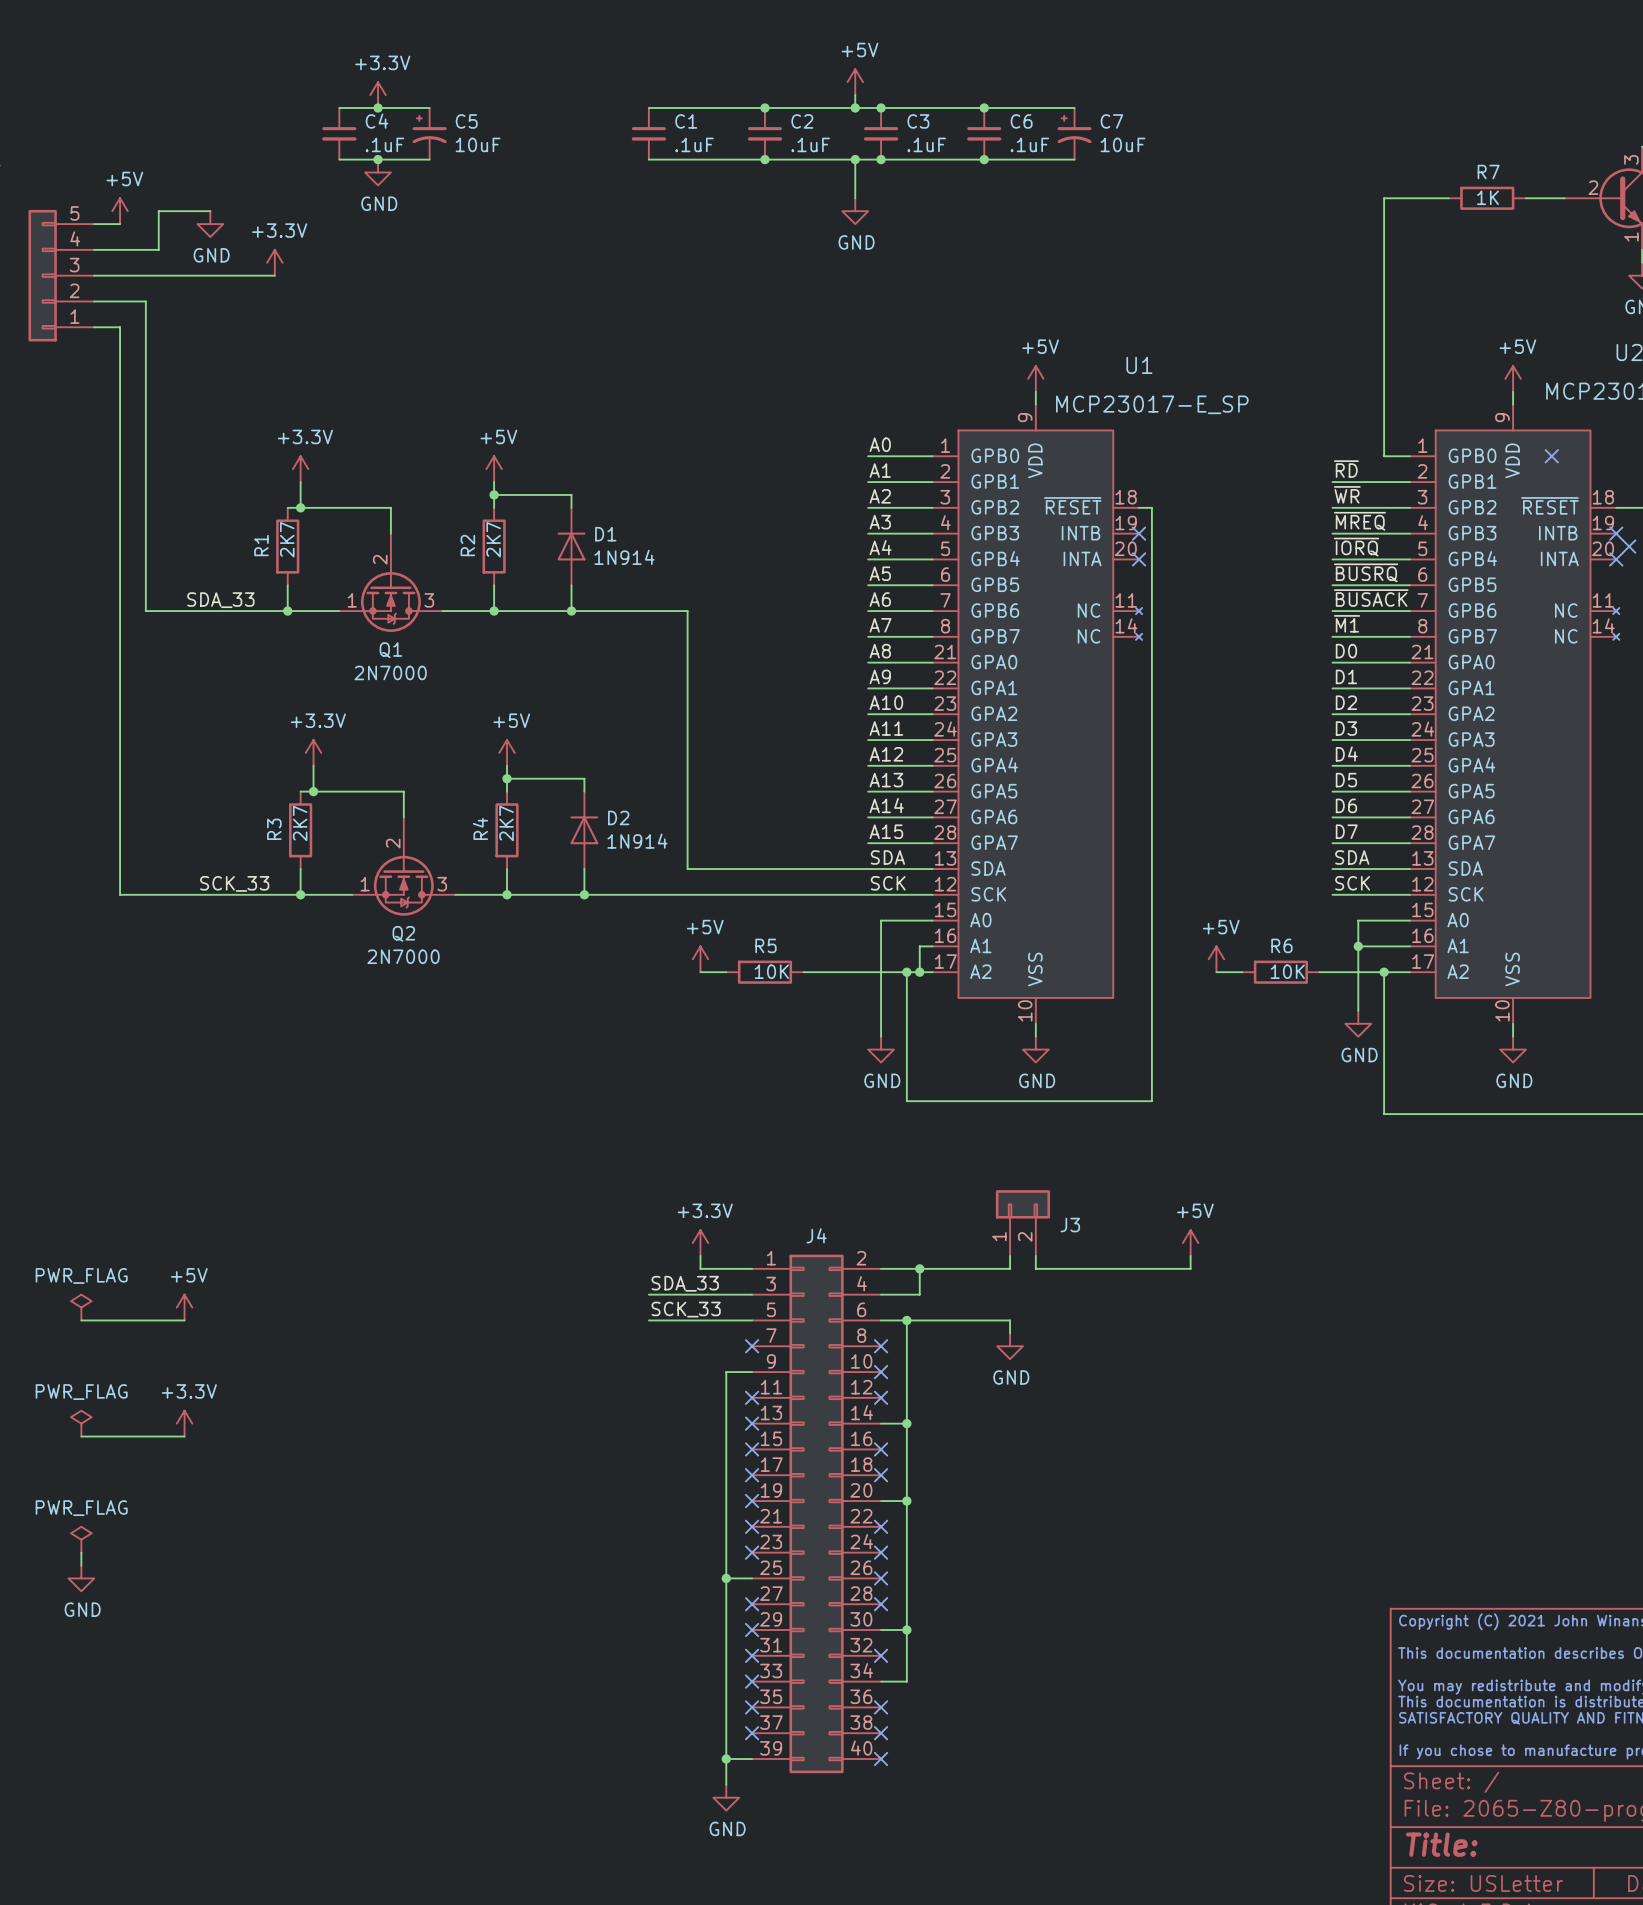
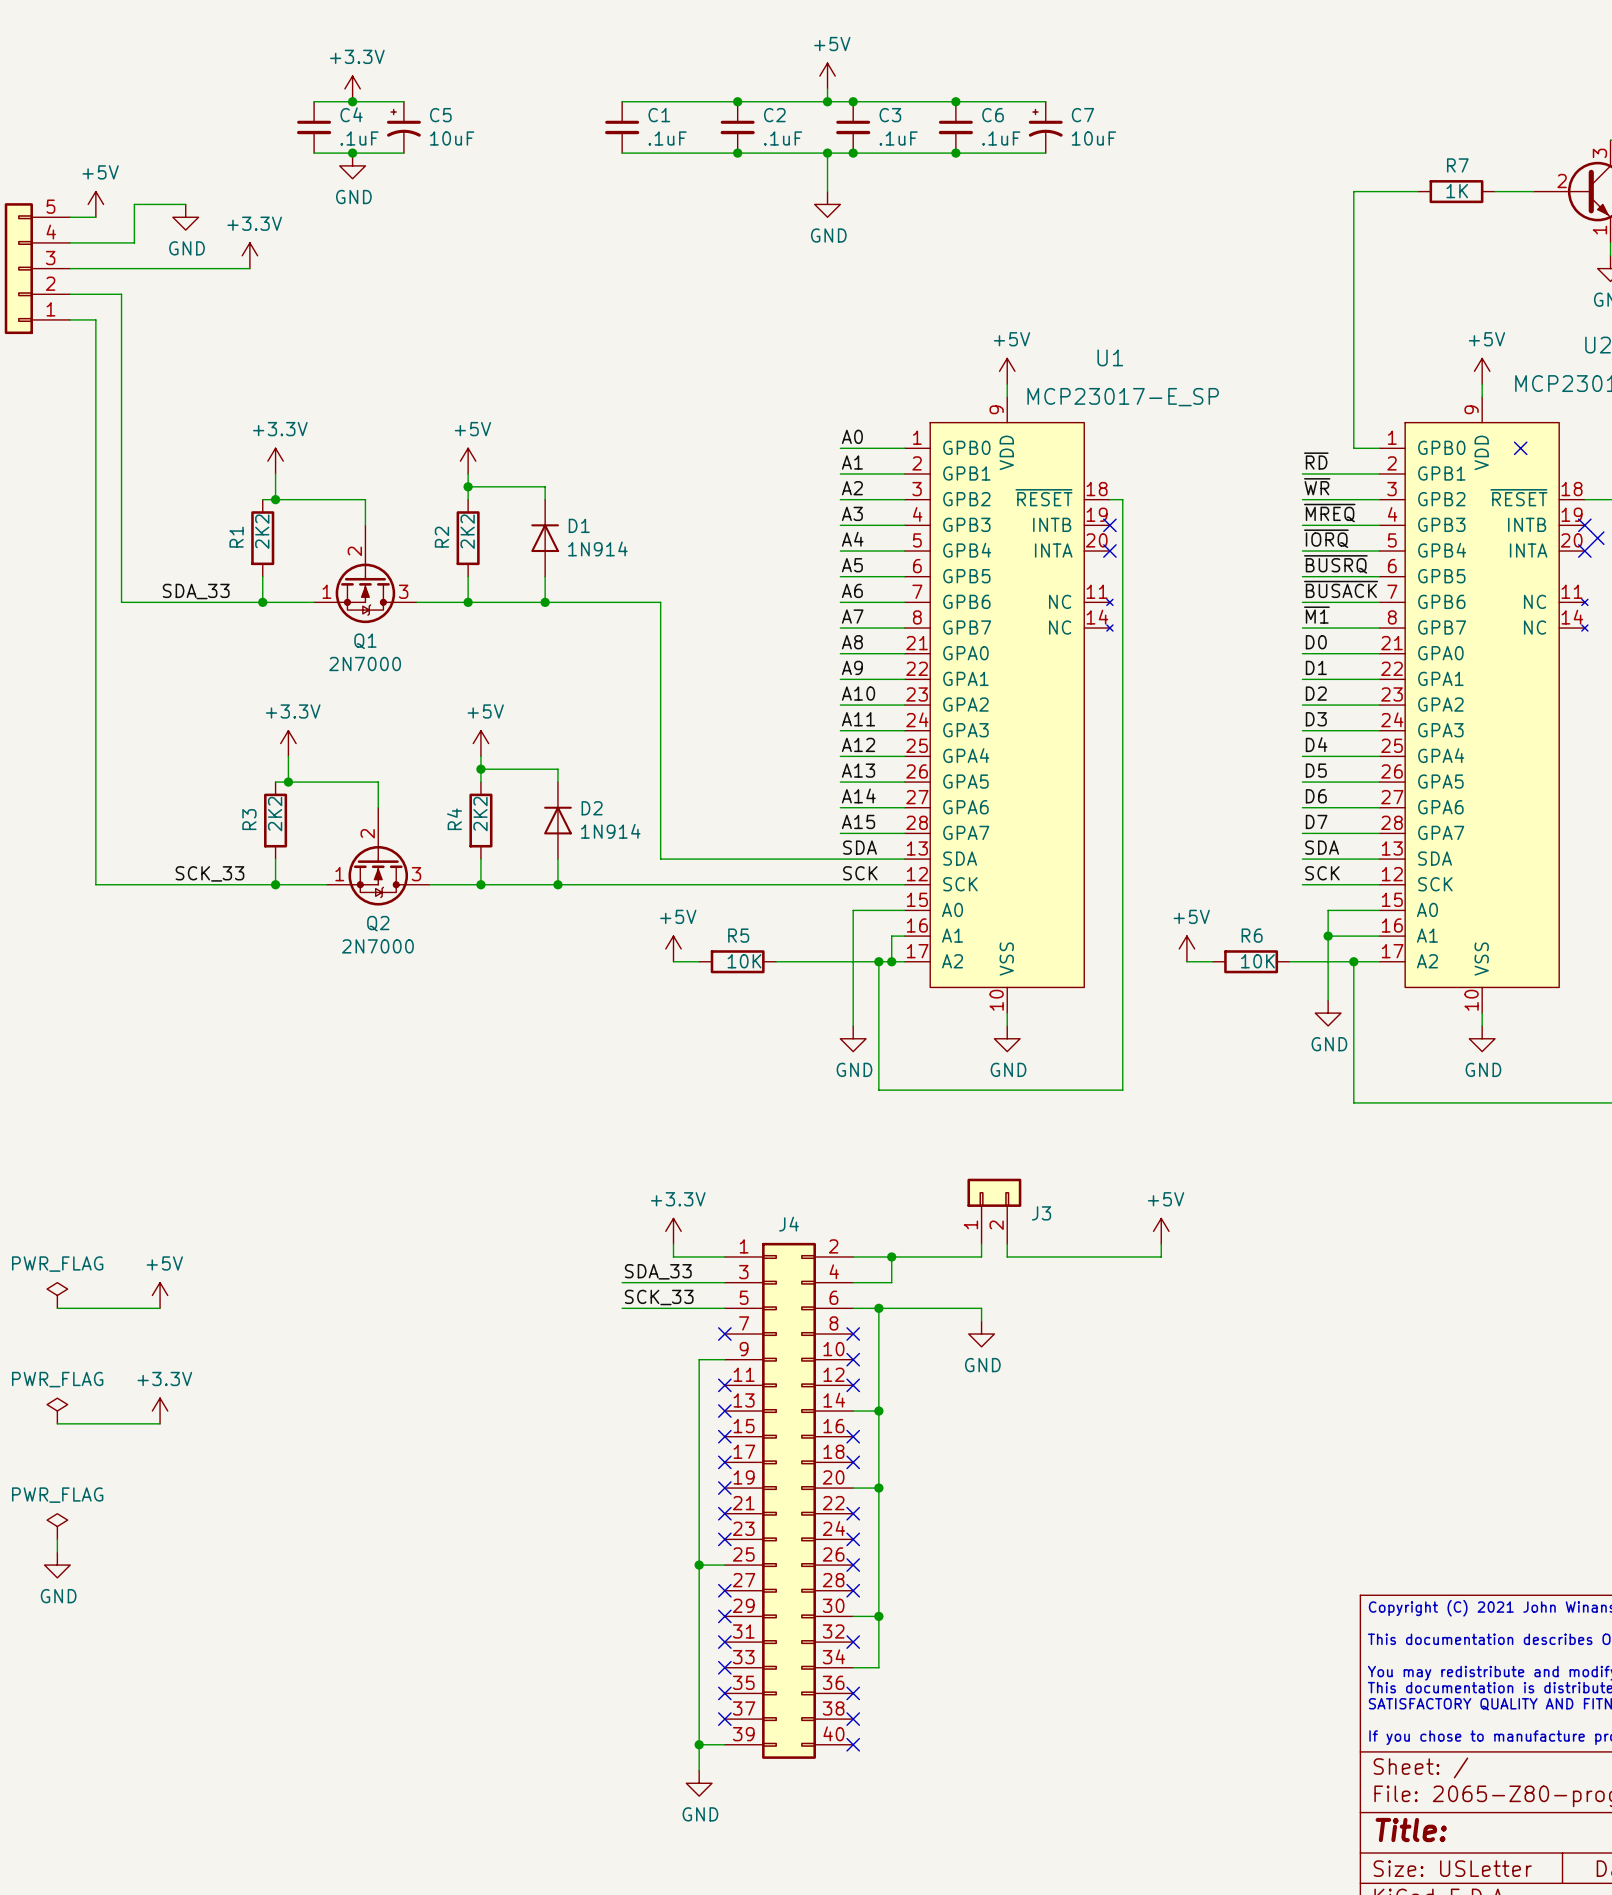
R1 value: 2K7 (287, 539) -> 2K2 (262, 531)
R2 value: 2K7 (493, 539) -> 2K2 (467, 531)
R3 value: 2K7 (300, 823) -> 2K2 (275, 814)
R4 value: 2K7 (506, 823) -> 2K2 (480, 814)

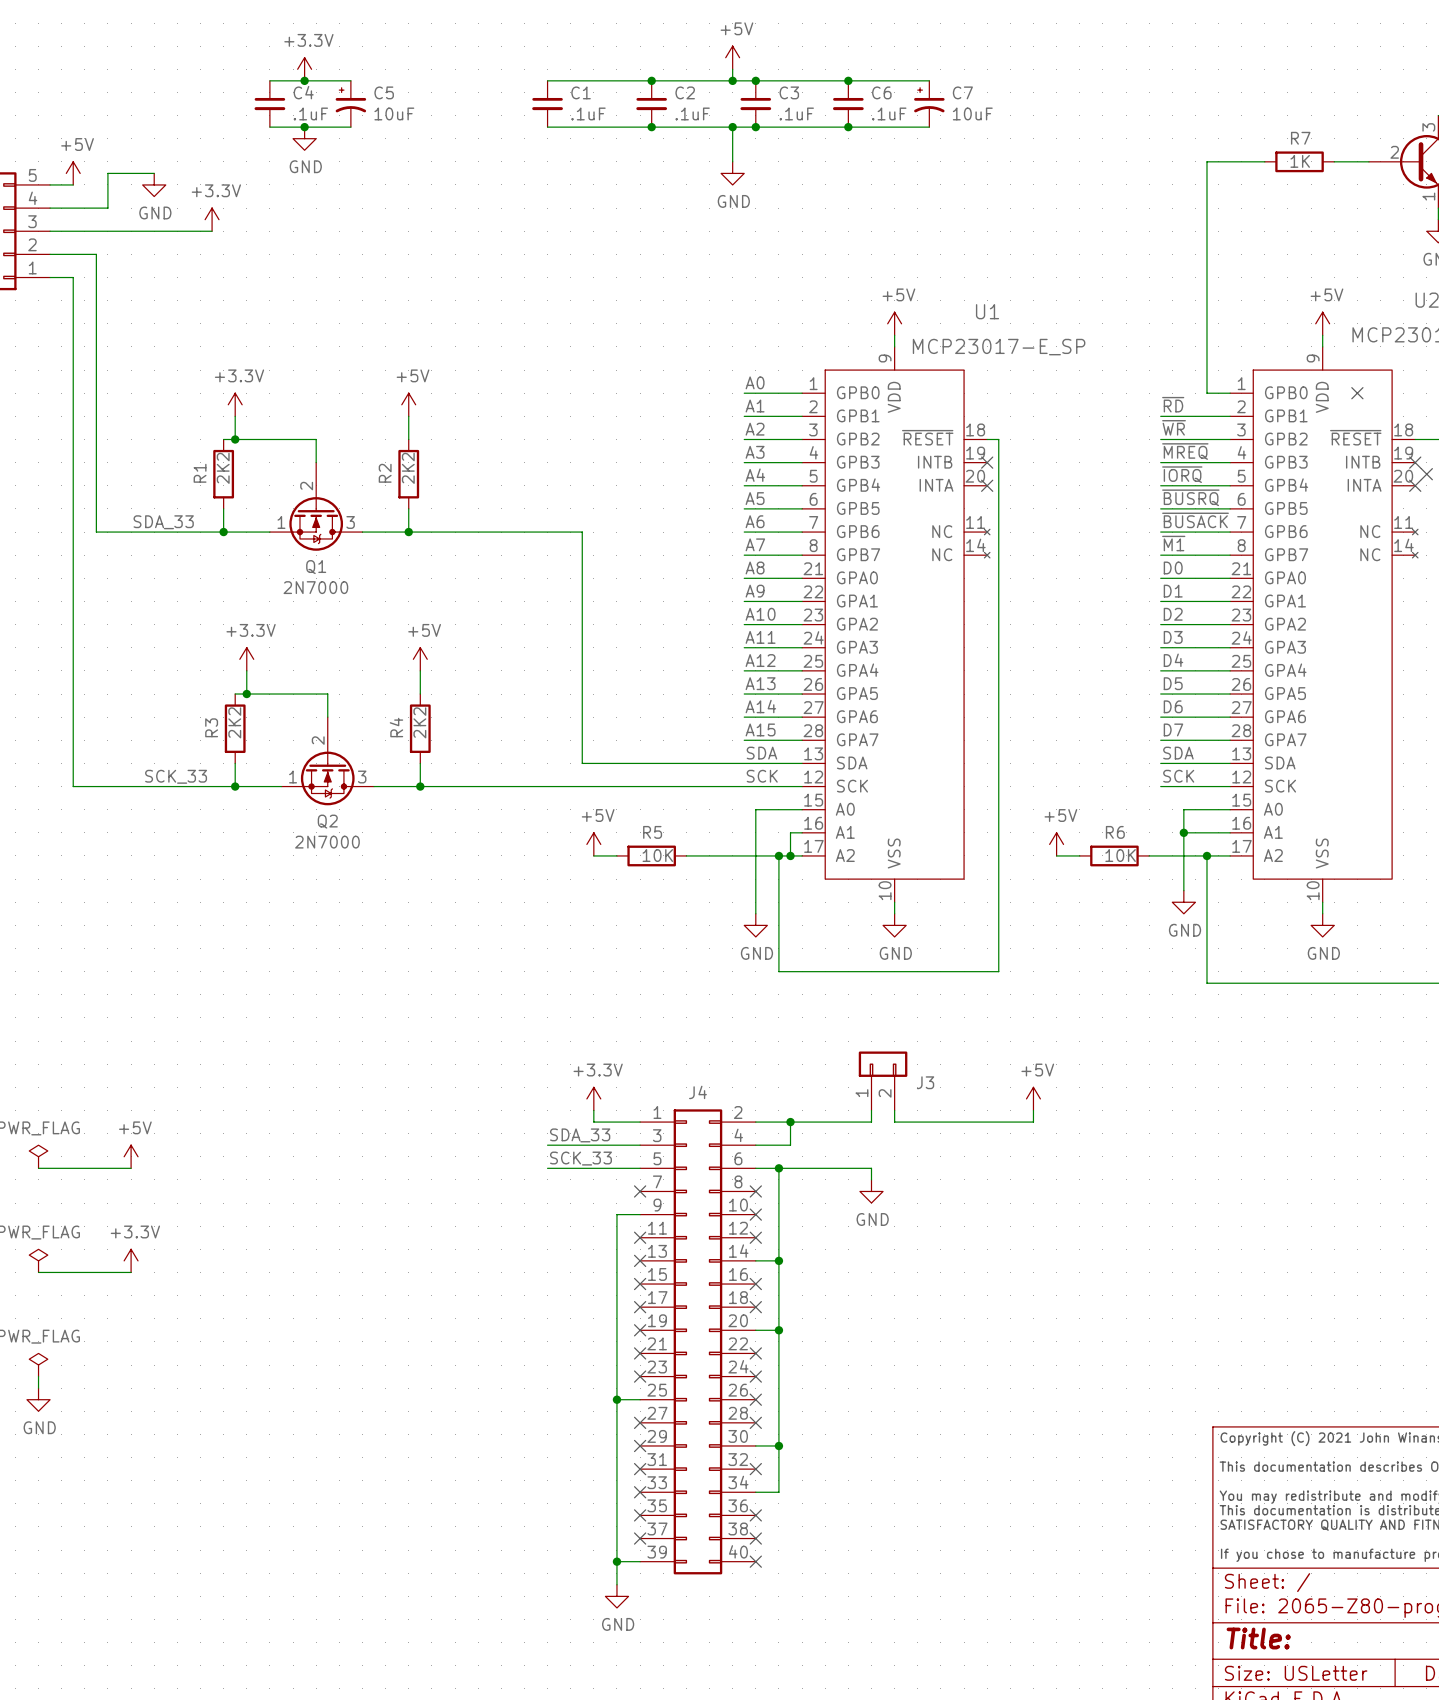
wire: (468, 486) (545, 486) (545, 499) -> none
junction: (468, 486) -> none
D1: 1N914 (545, 538) -> none
wire: (545, 576) (545, 602) -> none
junction: (545, 602) -> none
wire: (480, 769) (557, 769) (557, 782) -> none
junction: (480, 769) -> none
D2: 1N914 (557, 820) -> none
wire: (557, 859) (557, 884) -> none
junction: (557, 884) -> none

